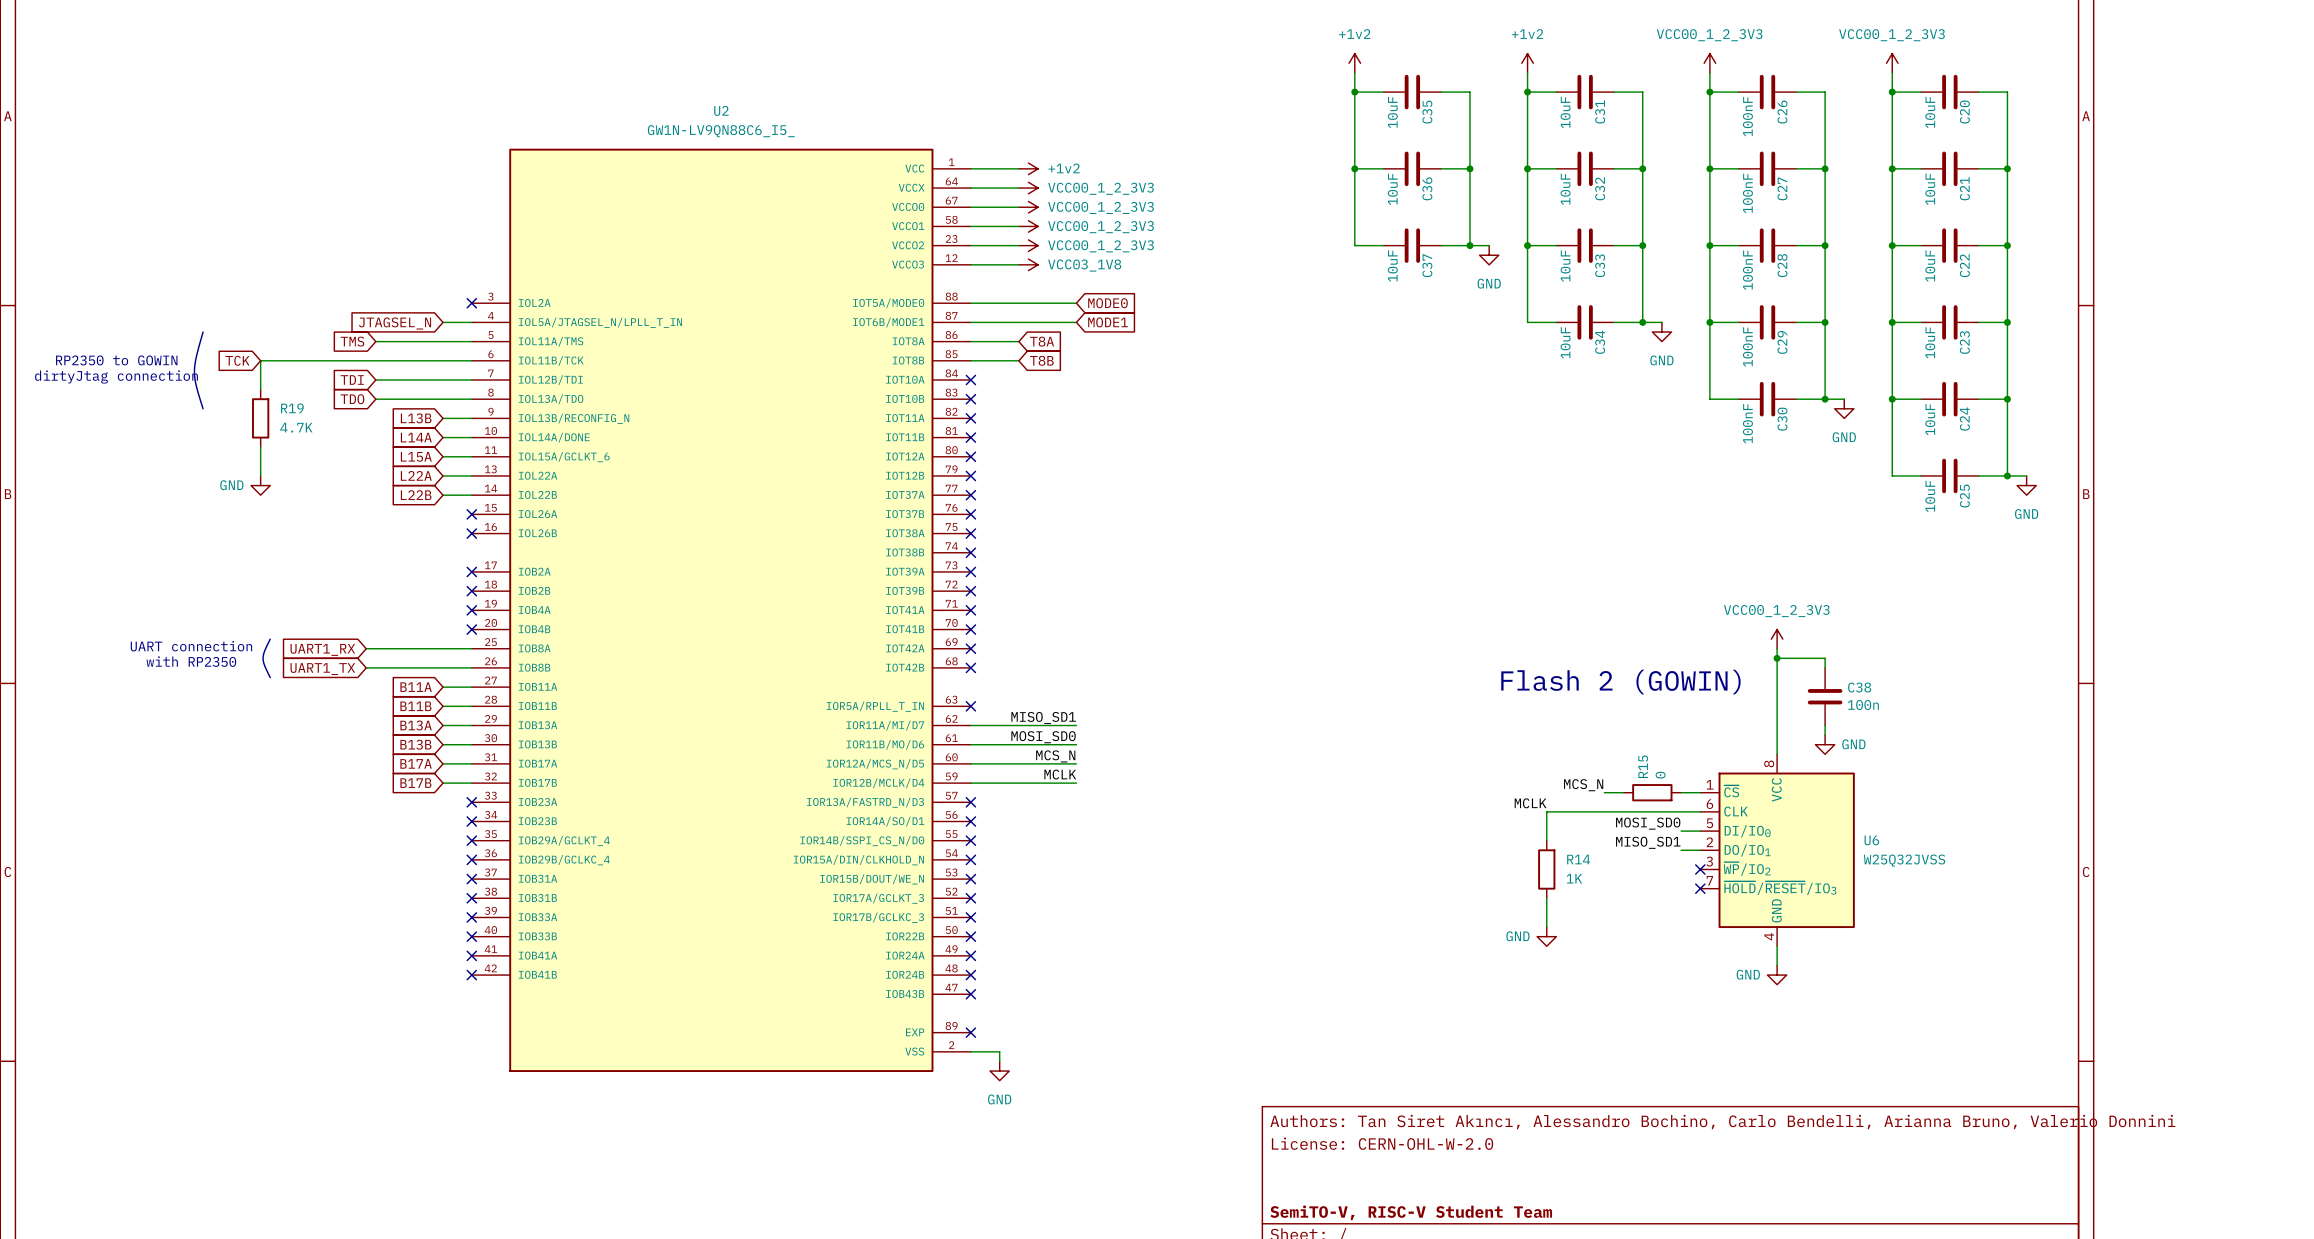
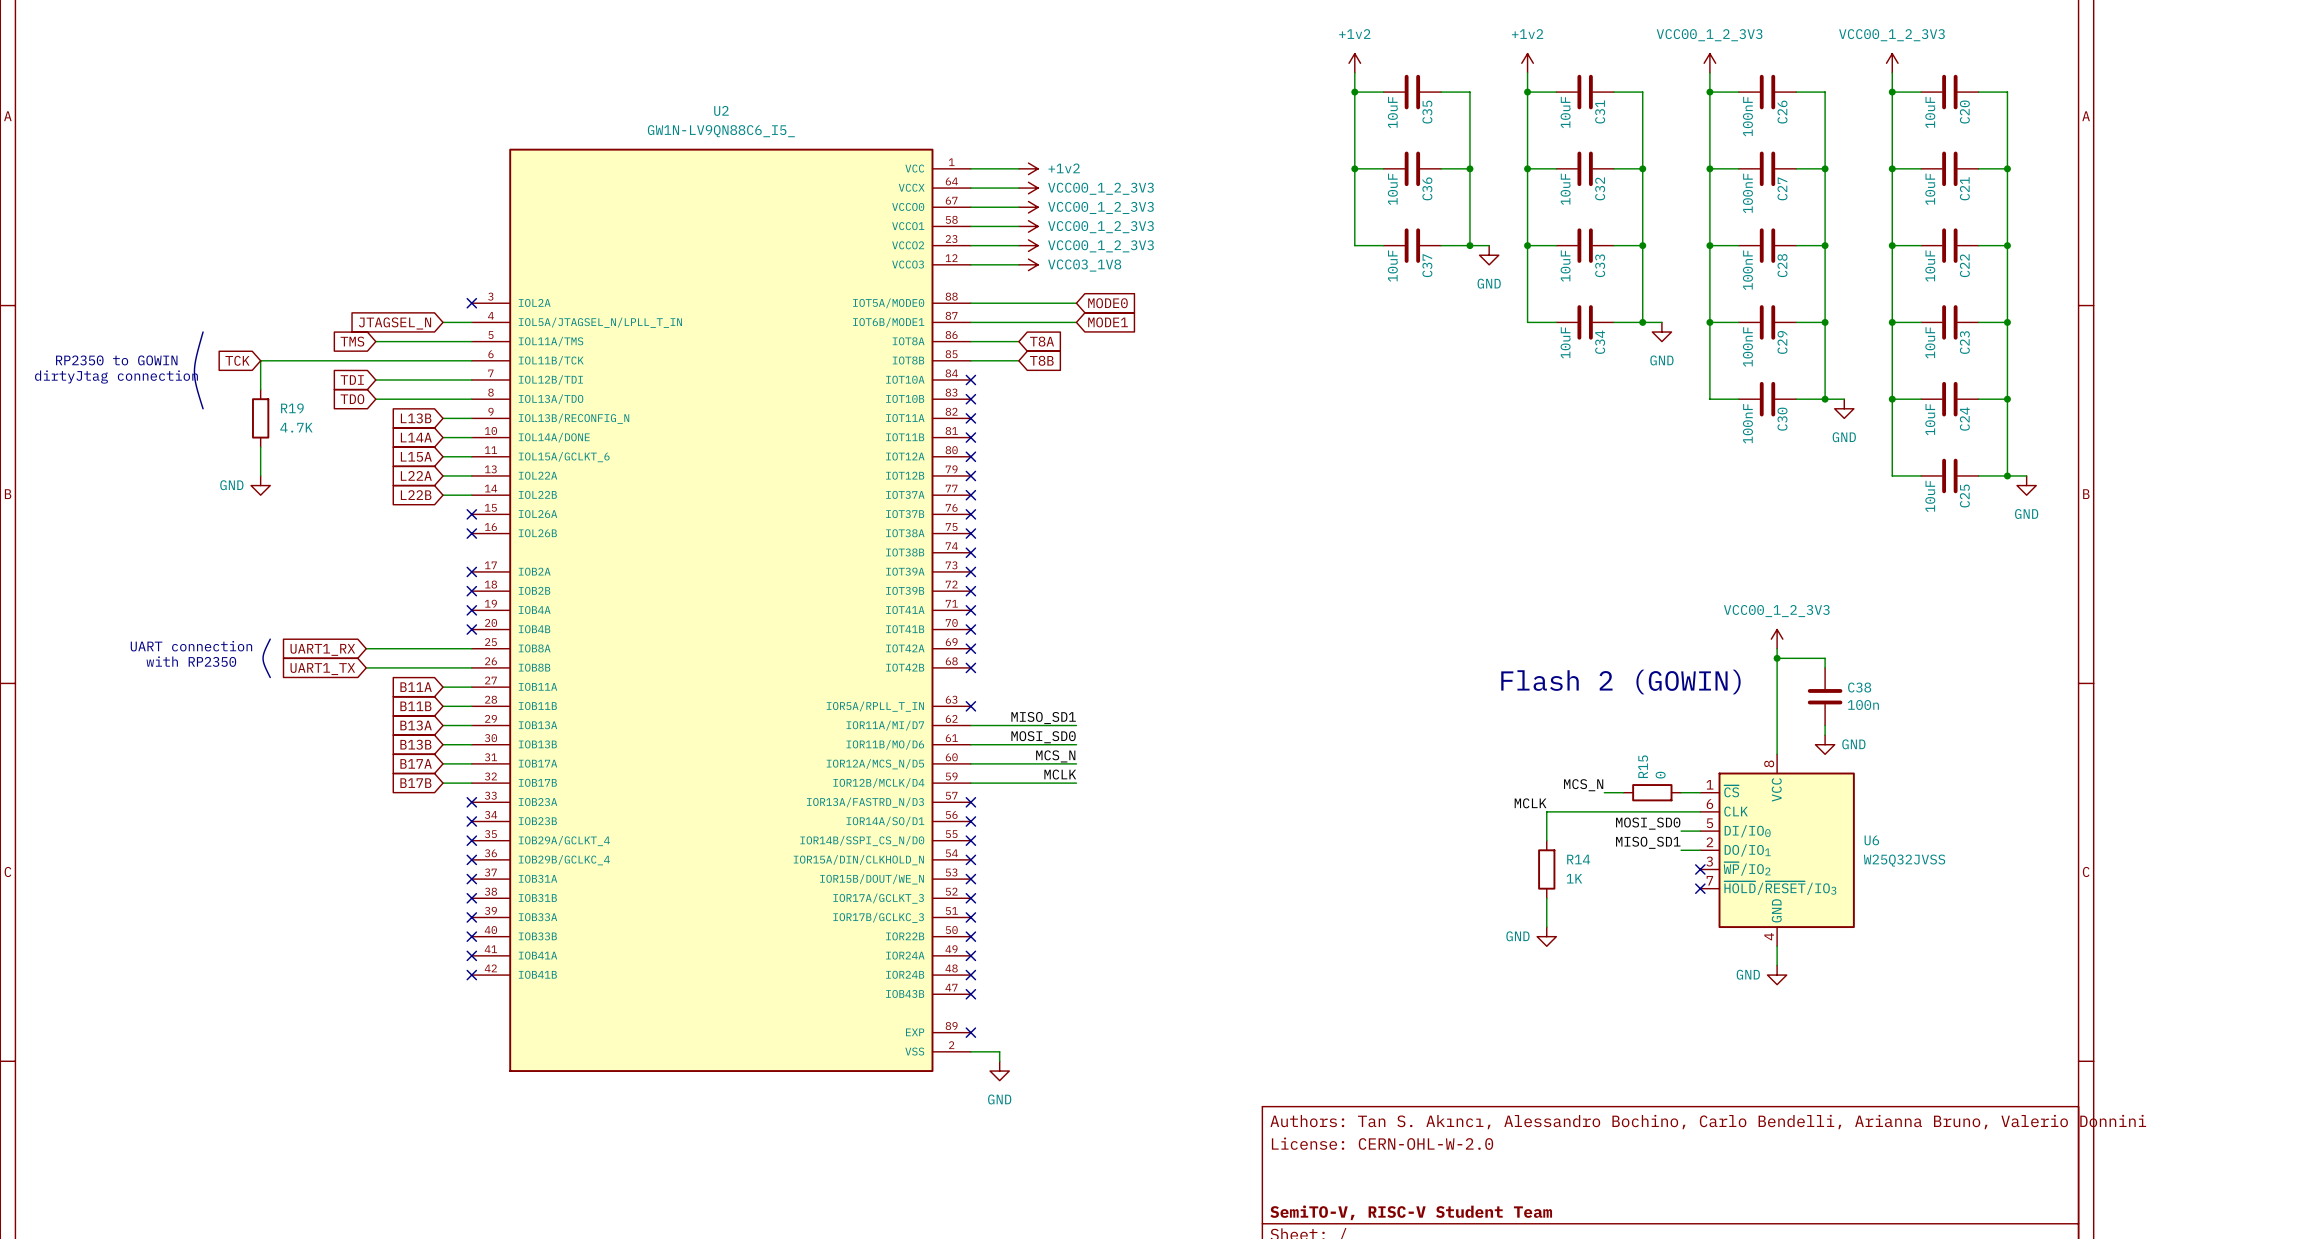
title block: Authors: Tan Siret Akıncı, Alessandro Bochino, Carlo Bendelli, Arianna Bruno, Valerio Donnini (1722, 1122) -> Authors: Tan S. Akıncı, Alessandro Bochino, Carlo Bendelli, Arianna Bruno, Valerio Donnini (1708, 1122)

